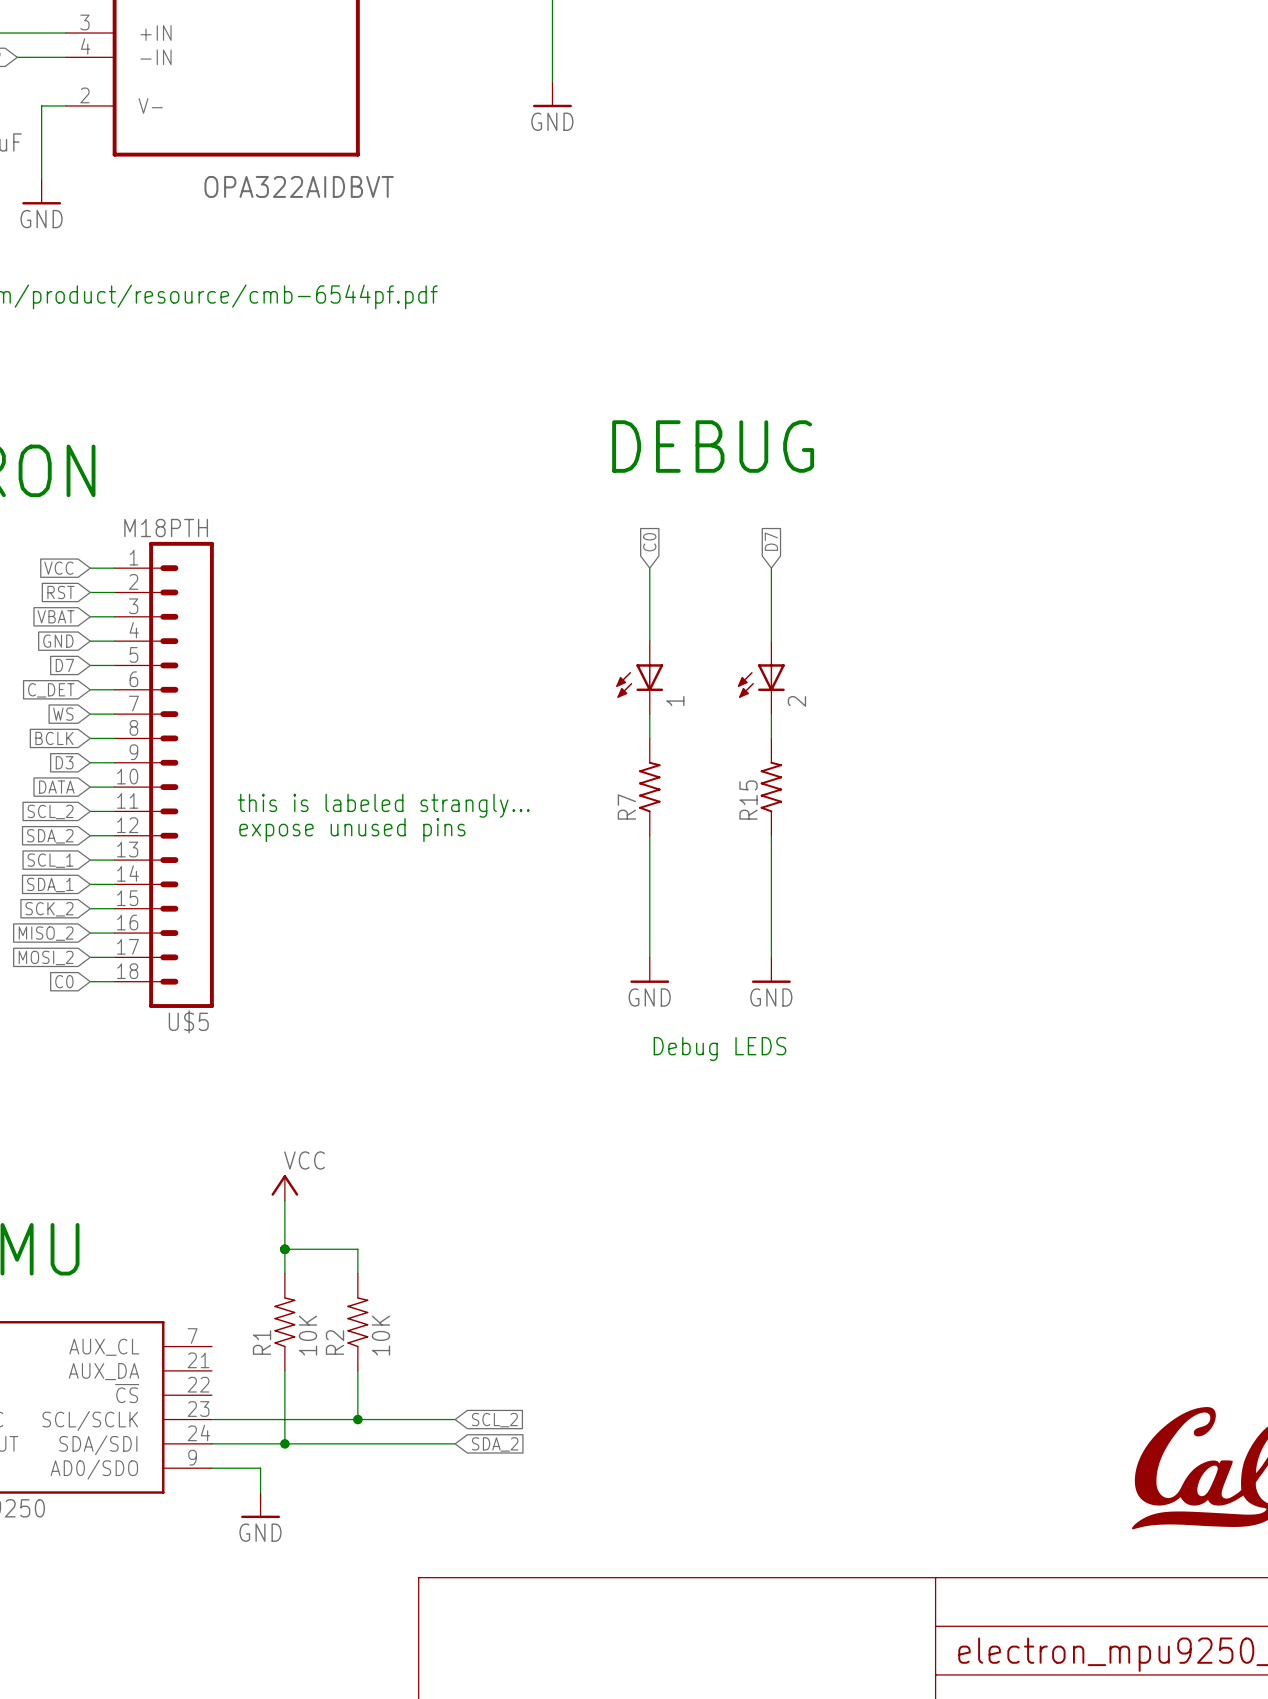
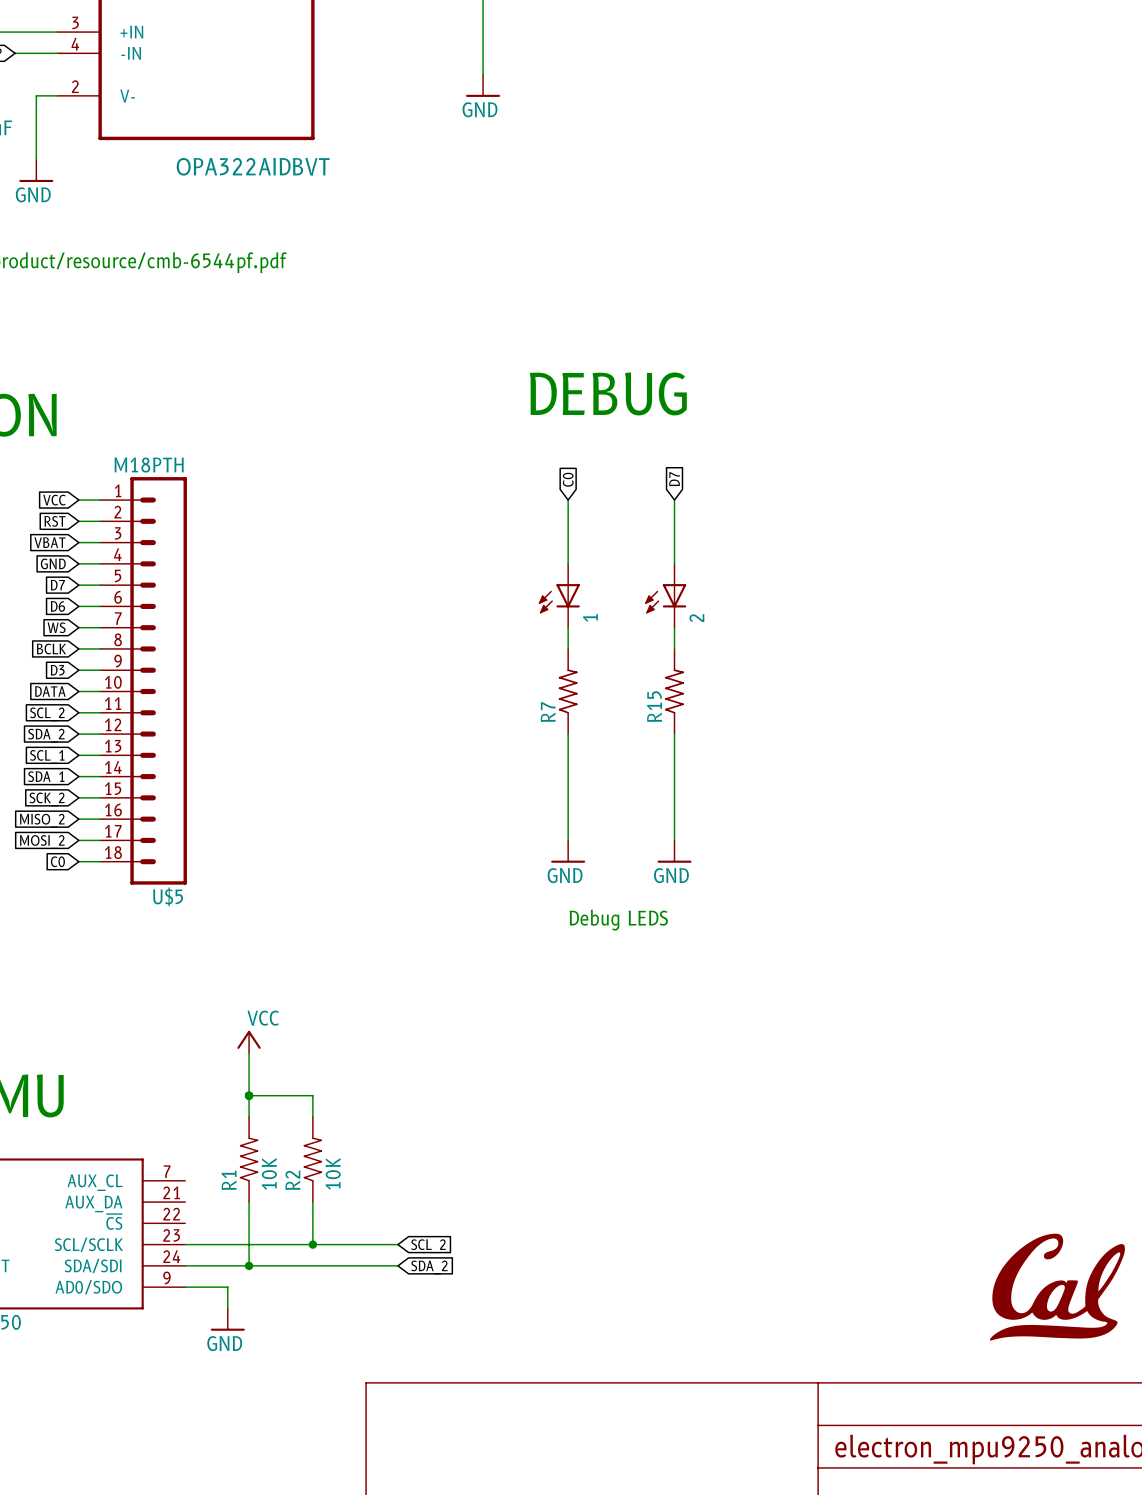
global label: C_DET (51, 690) -> D6 (57, 606)
text: this is labeled strangly... (383, 805) -> none
text: expose unused pins (352, 830) -> none

